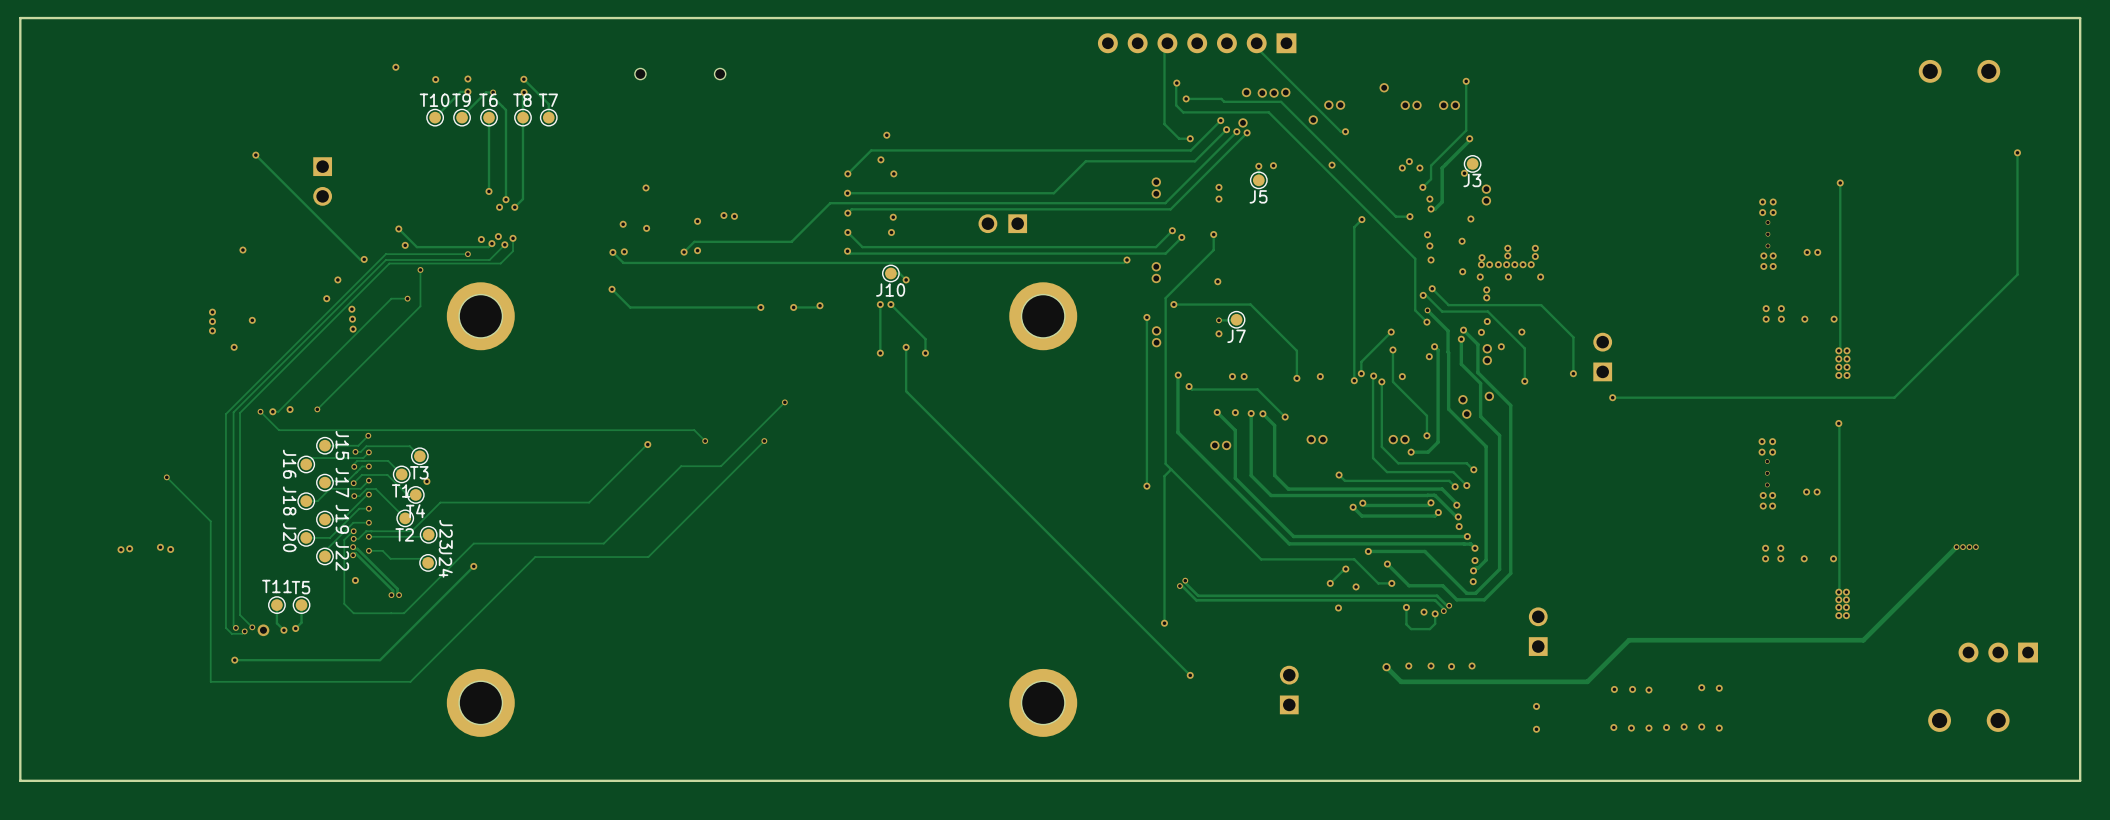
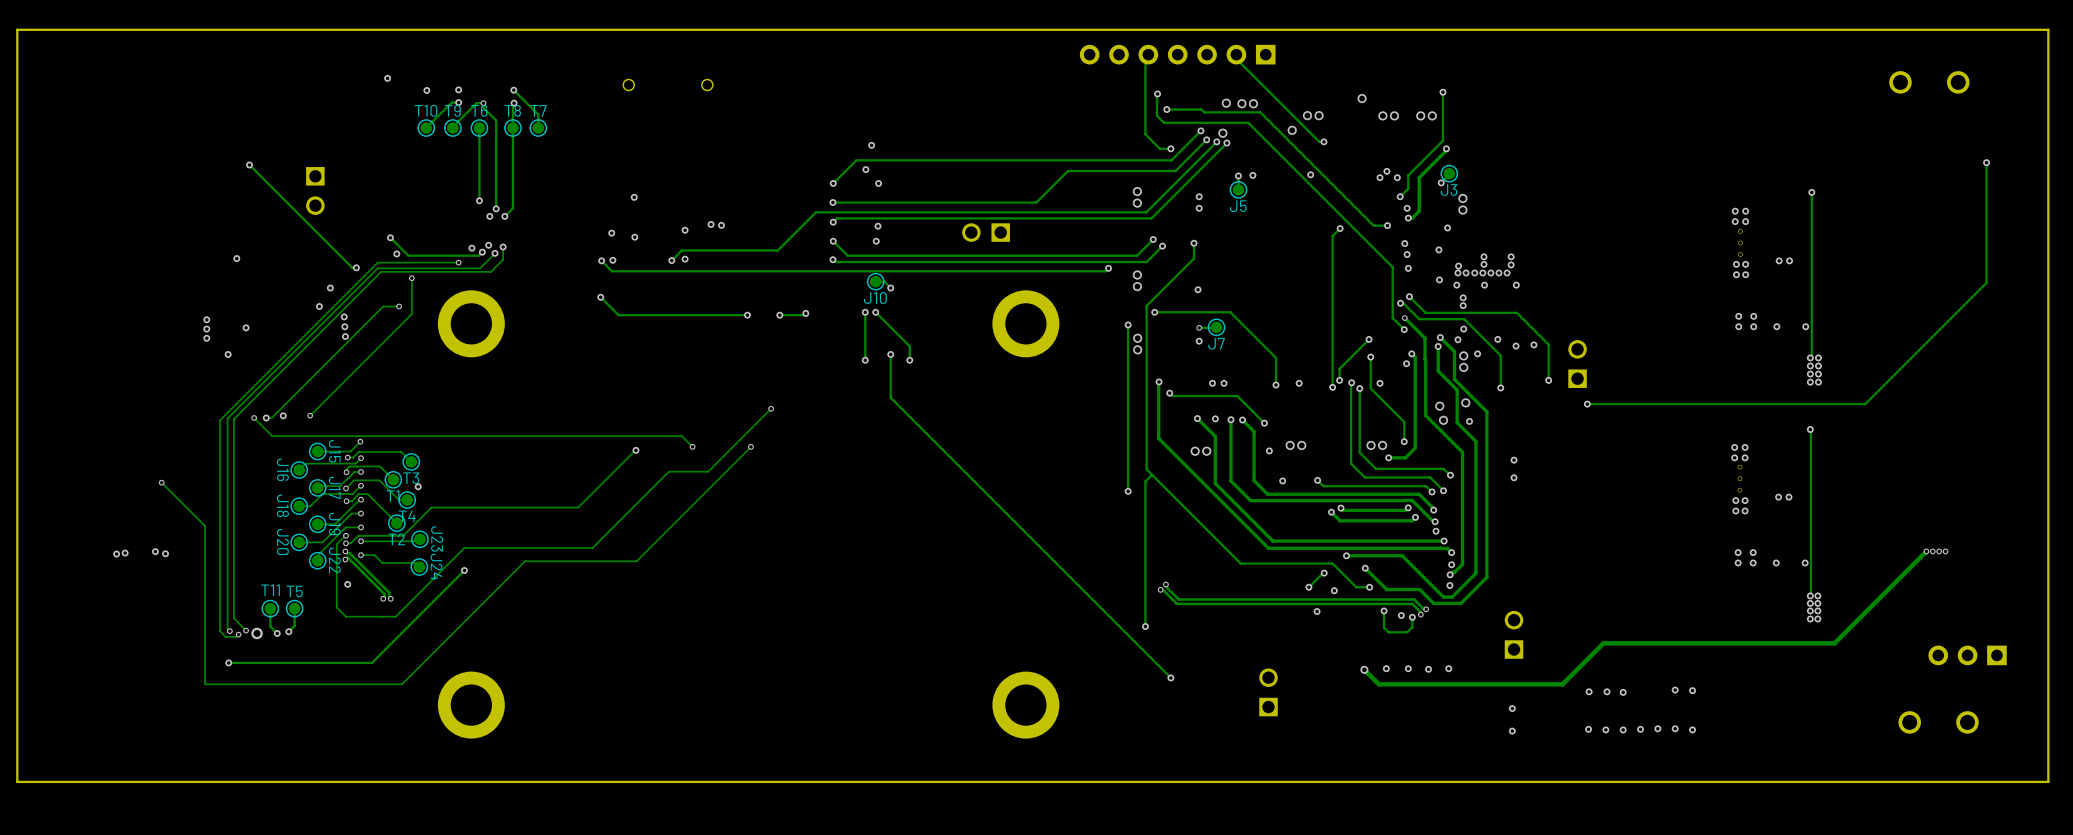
via: (1285, 92) -> none
via: none -> (1533, 344)
via: none -> (1516, 346)
via: none -> (1469, 421)
via: none -> (1269, 450)
via: none -> (1514, 460)
via: none -> (1514, 477)
via: none -> (1282, 480)

